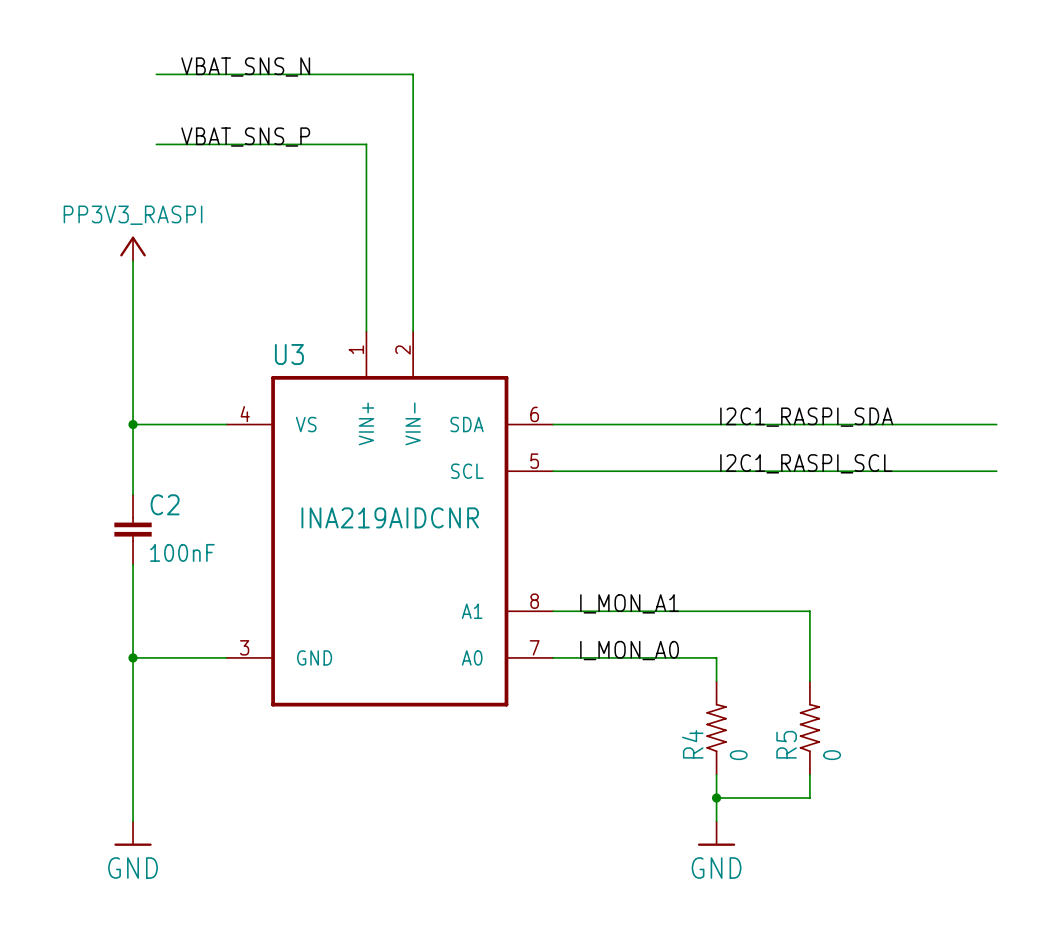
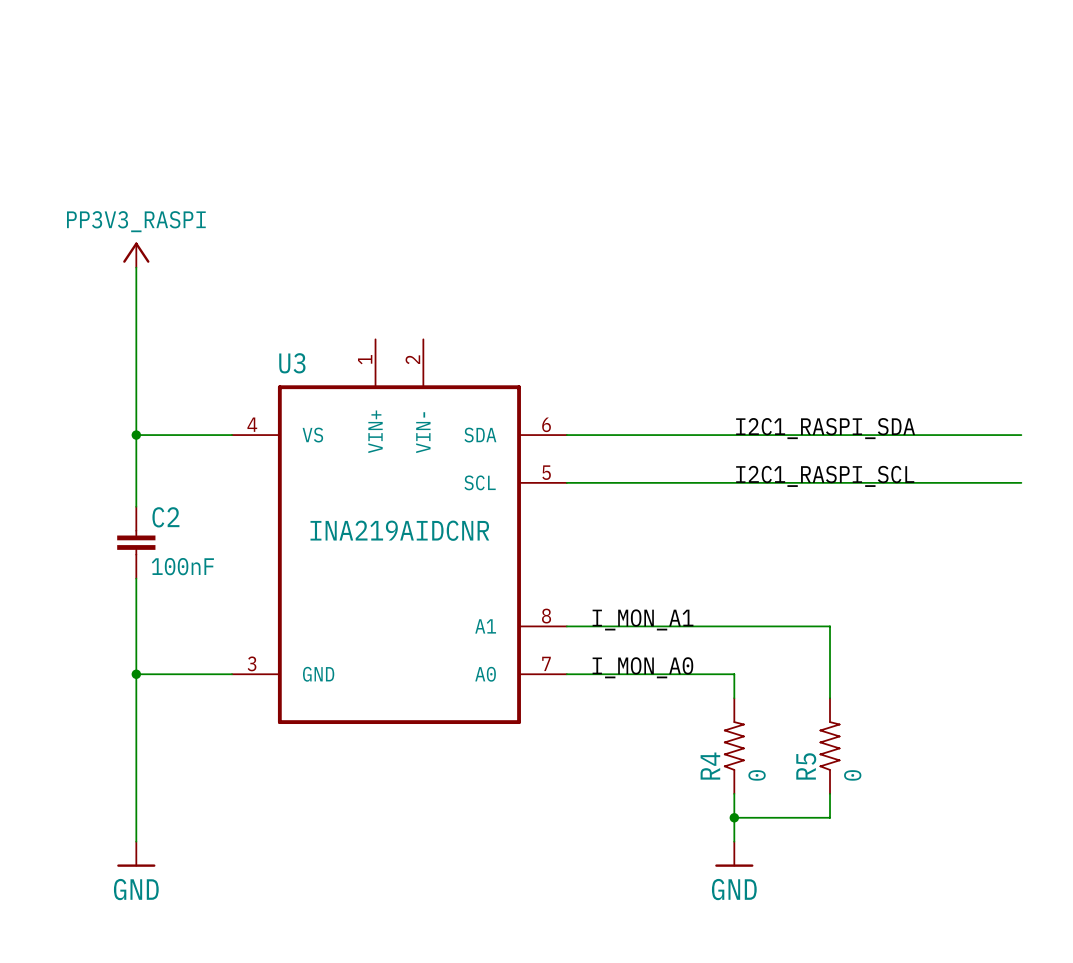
label: VBAT_SNS_N (245, 67) -> none
wire: (156, 74) (413, 74) (413, 331) -> none
label: VBAT_SNS_P (245, 137) -> none
wire: (156, 144) (366, 144) (366, 331) -> none

